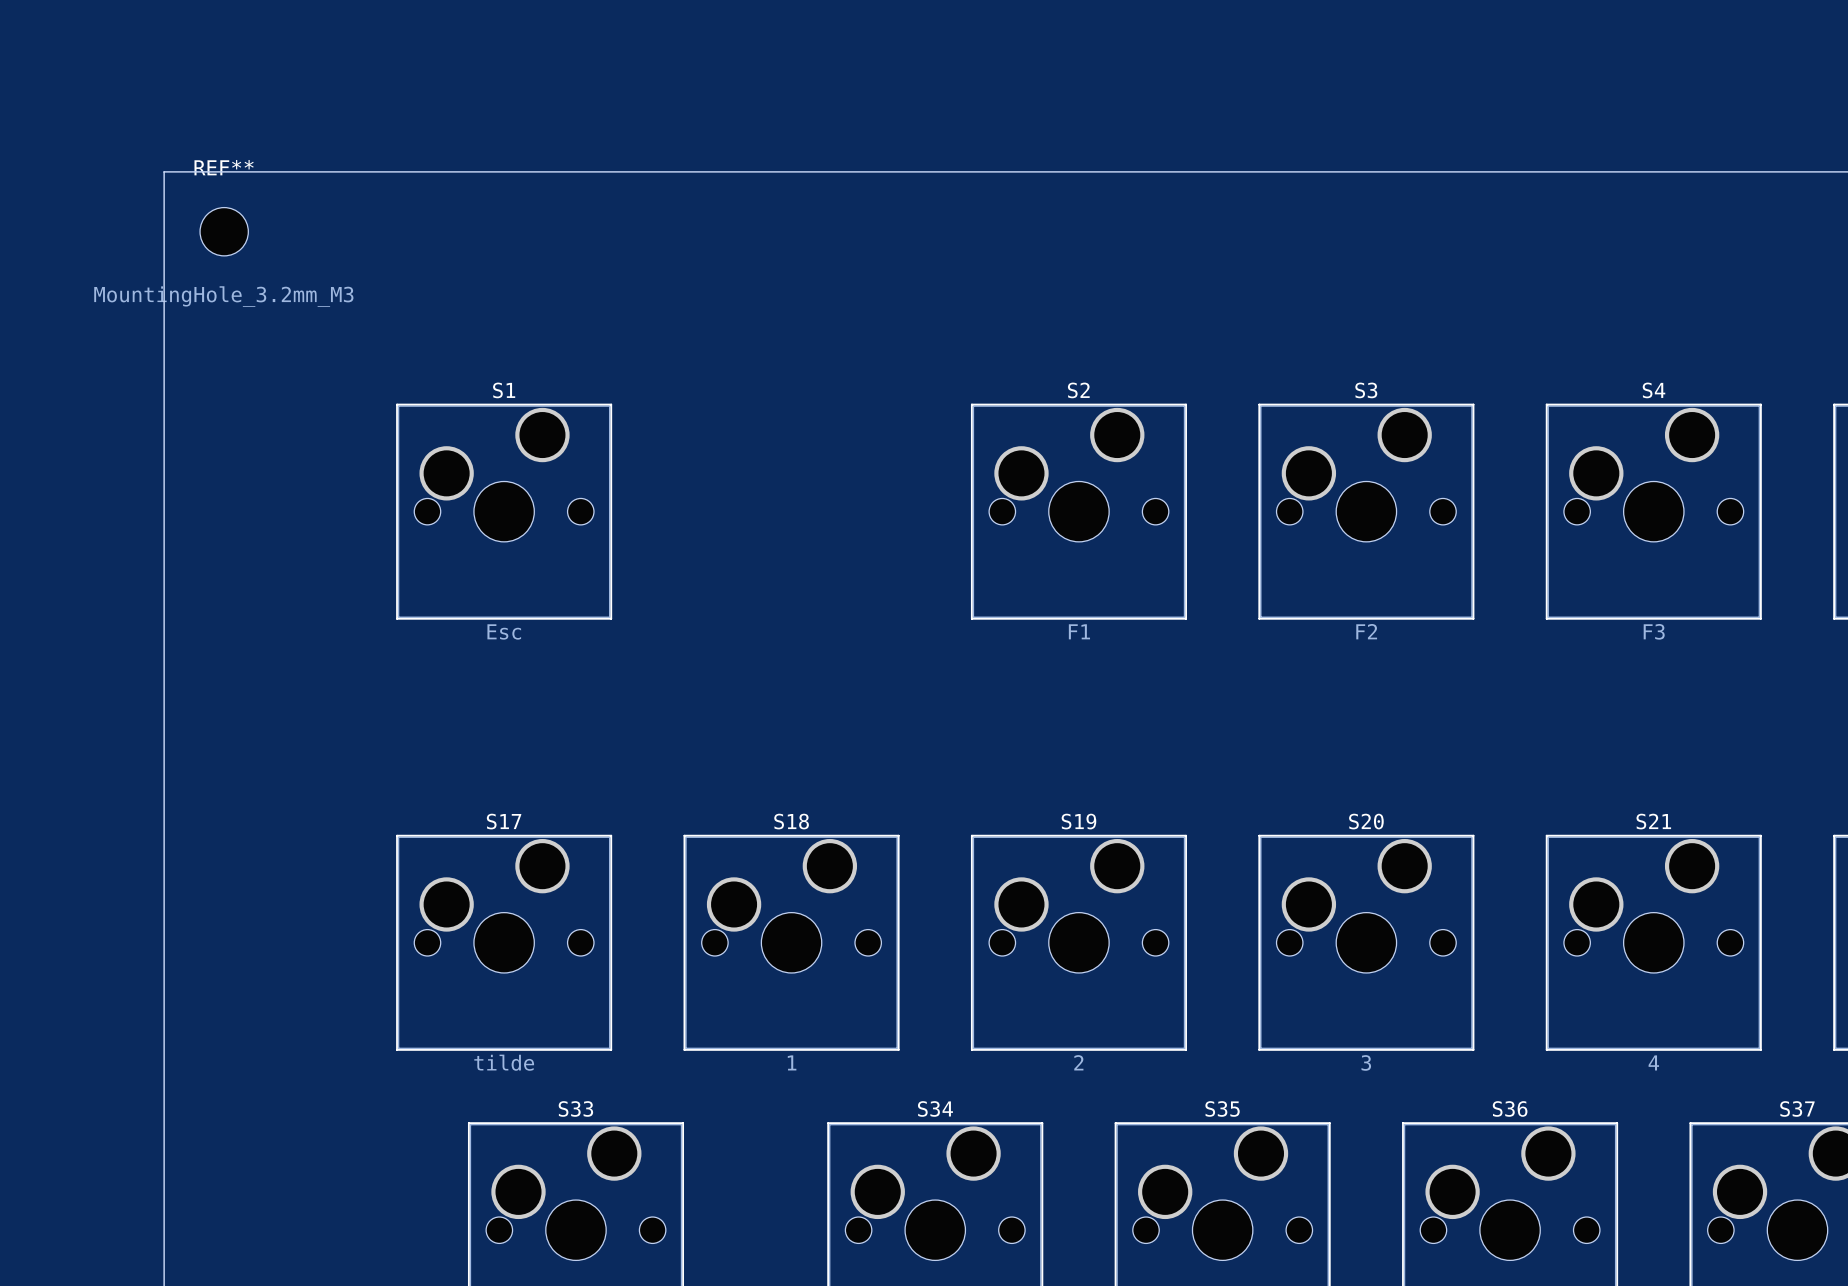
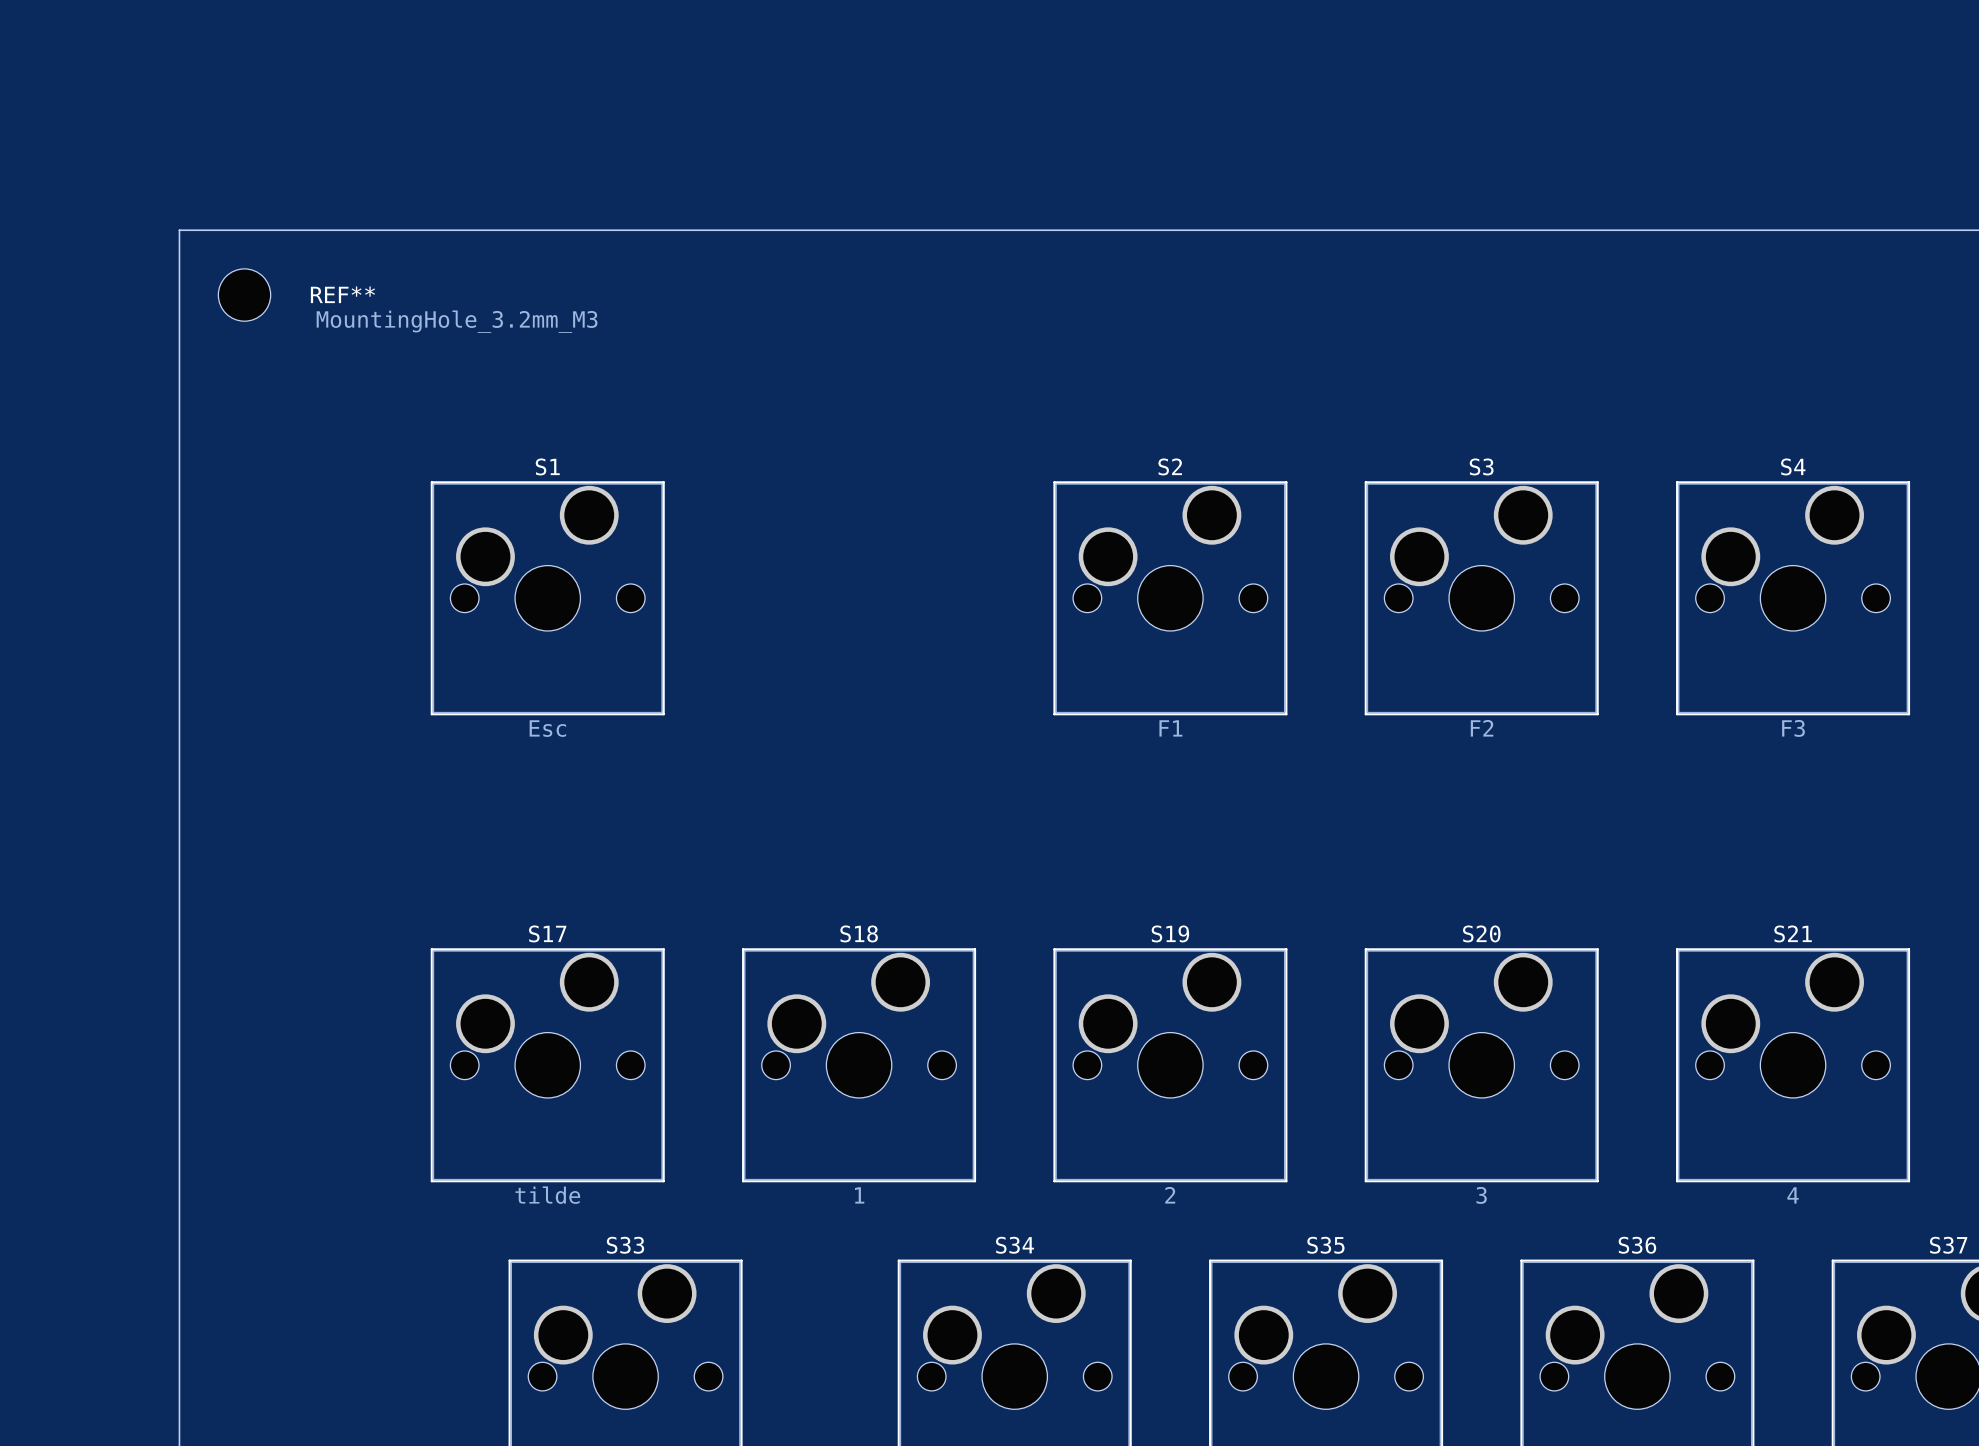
REF** name position: REF** (224, 167) -> REF** (342, 294)
REF** value position: MountingHole_3.2mm_M3 (223, 296) -> MountingHole_3.2mm_M3 (457, 321)

